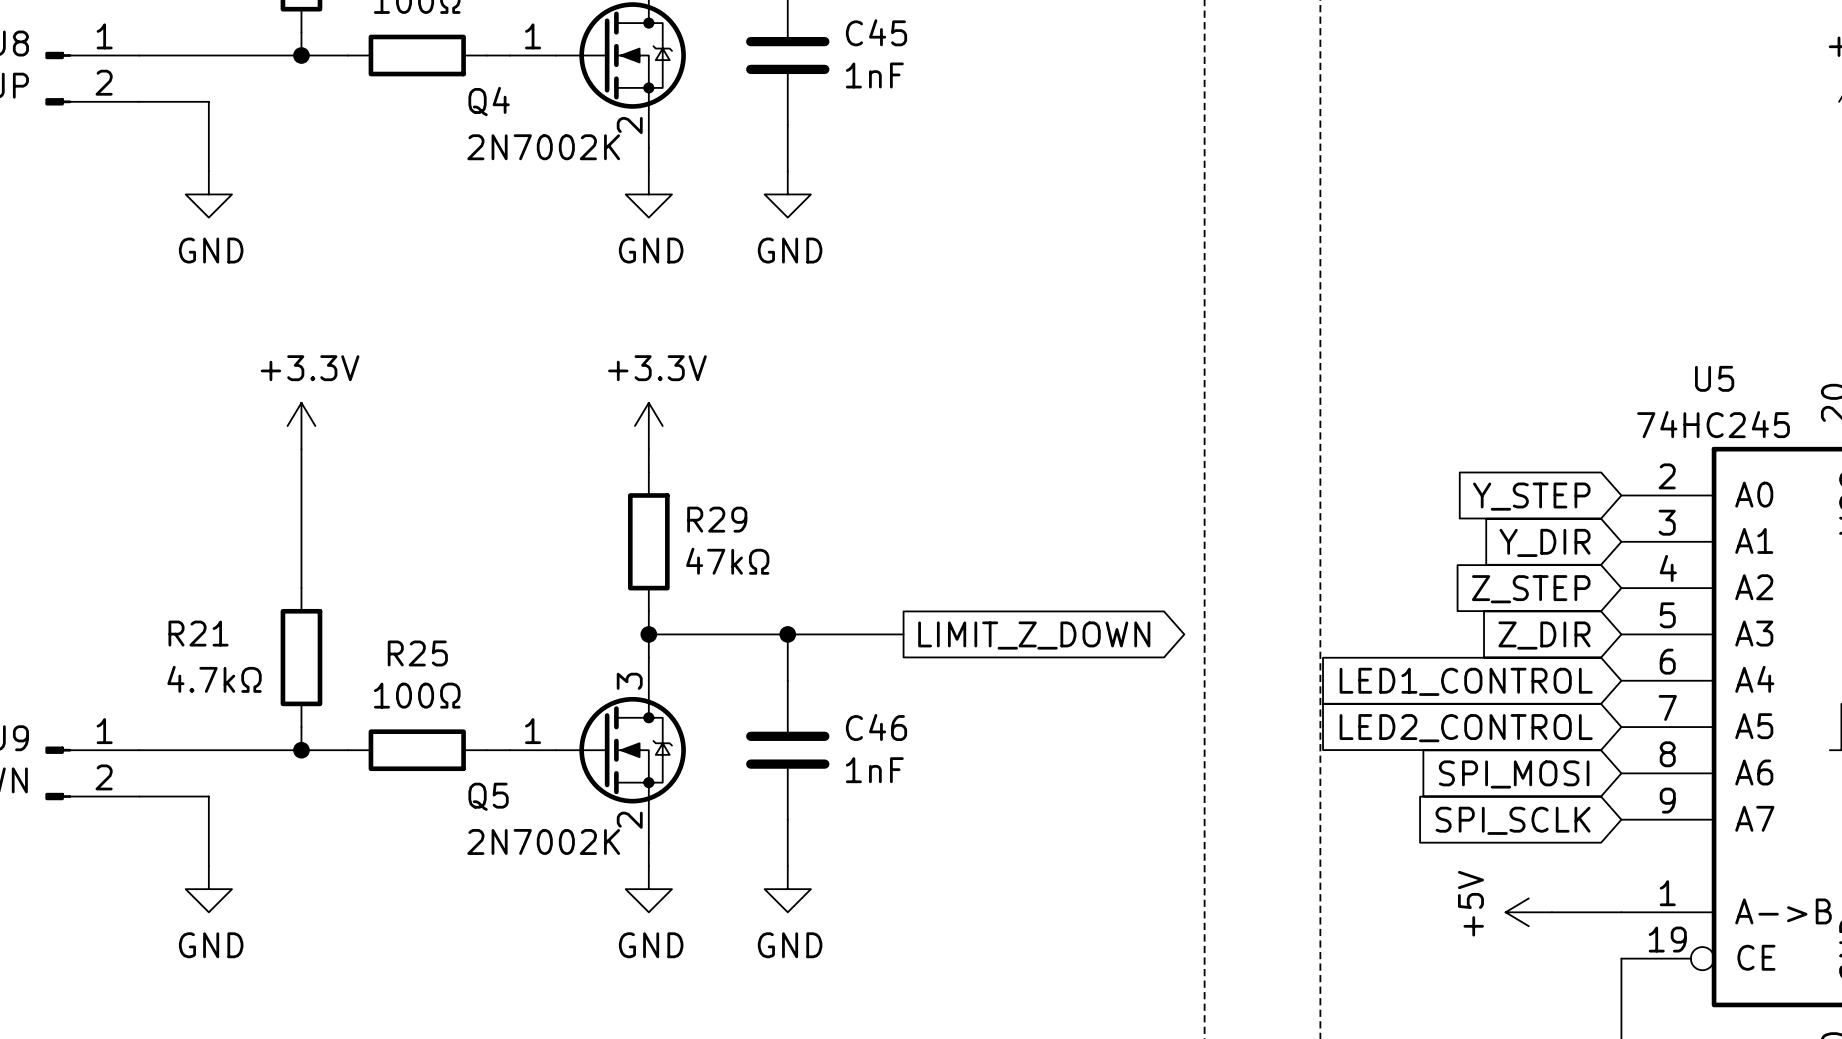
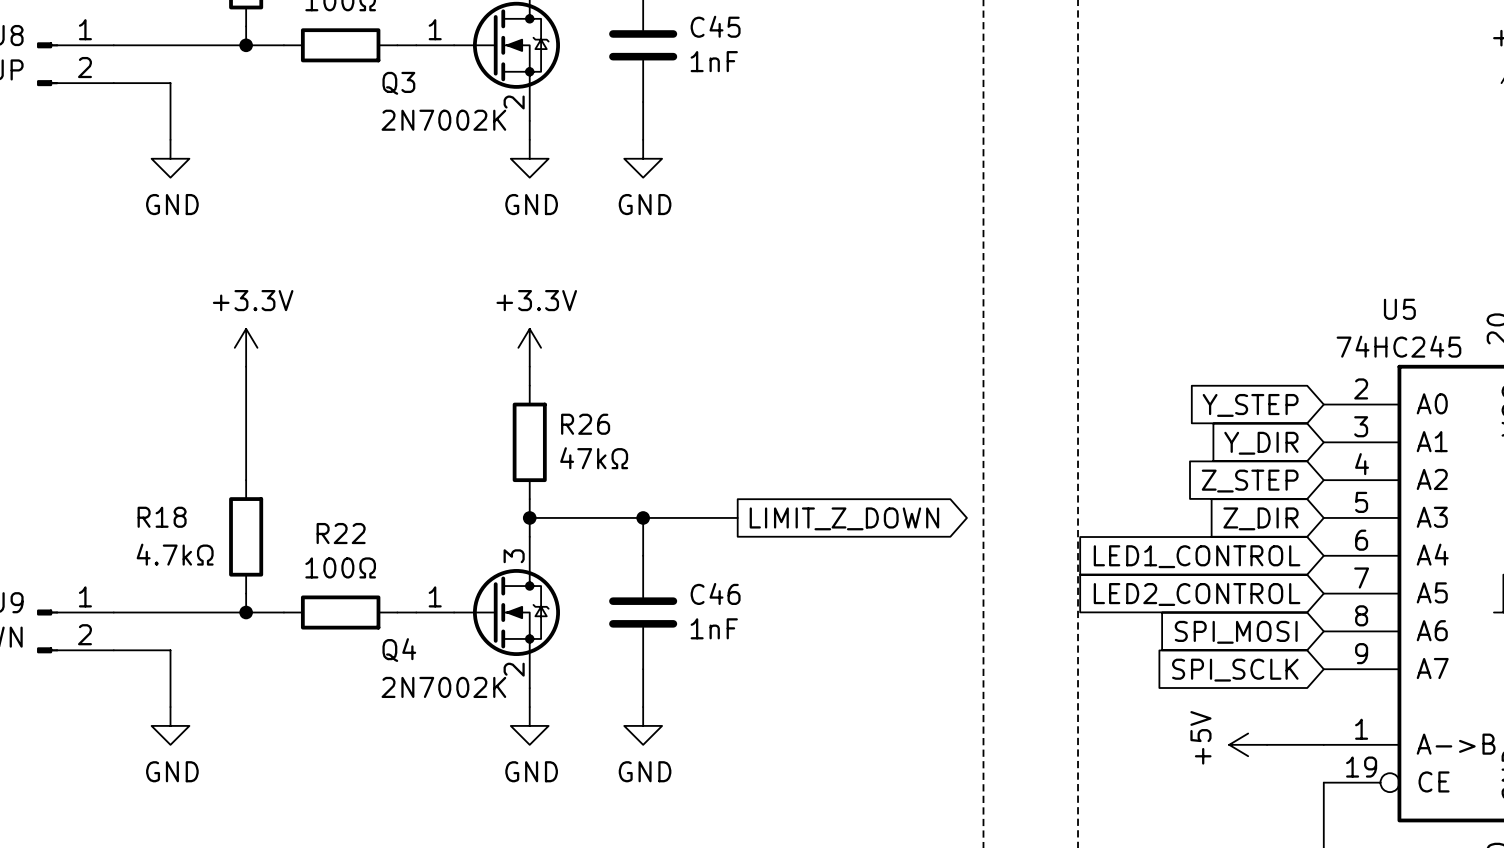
Q4 name: Q4 (489, 101) -> Q3 (398, 83)
R29 name: R29 (717, 519) -> R26 (585, 424)
R21 name: R21 (198, 633) -> R18 (162, 517)
R25 name: R25 (417, 653) -> R22 (341, 533)
Q5 name: Q5 (488, 796) -> Q4 (399, 650)

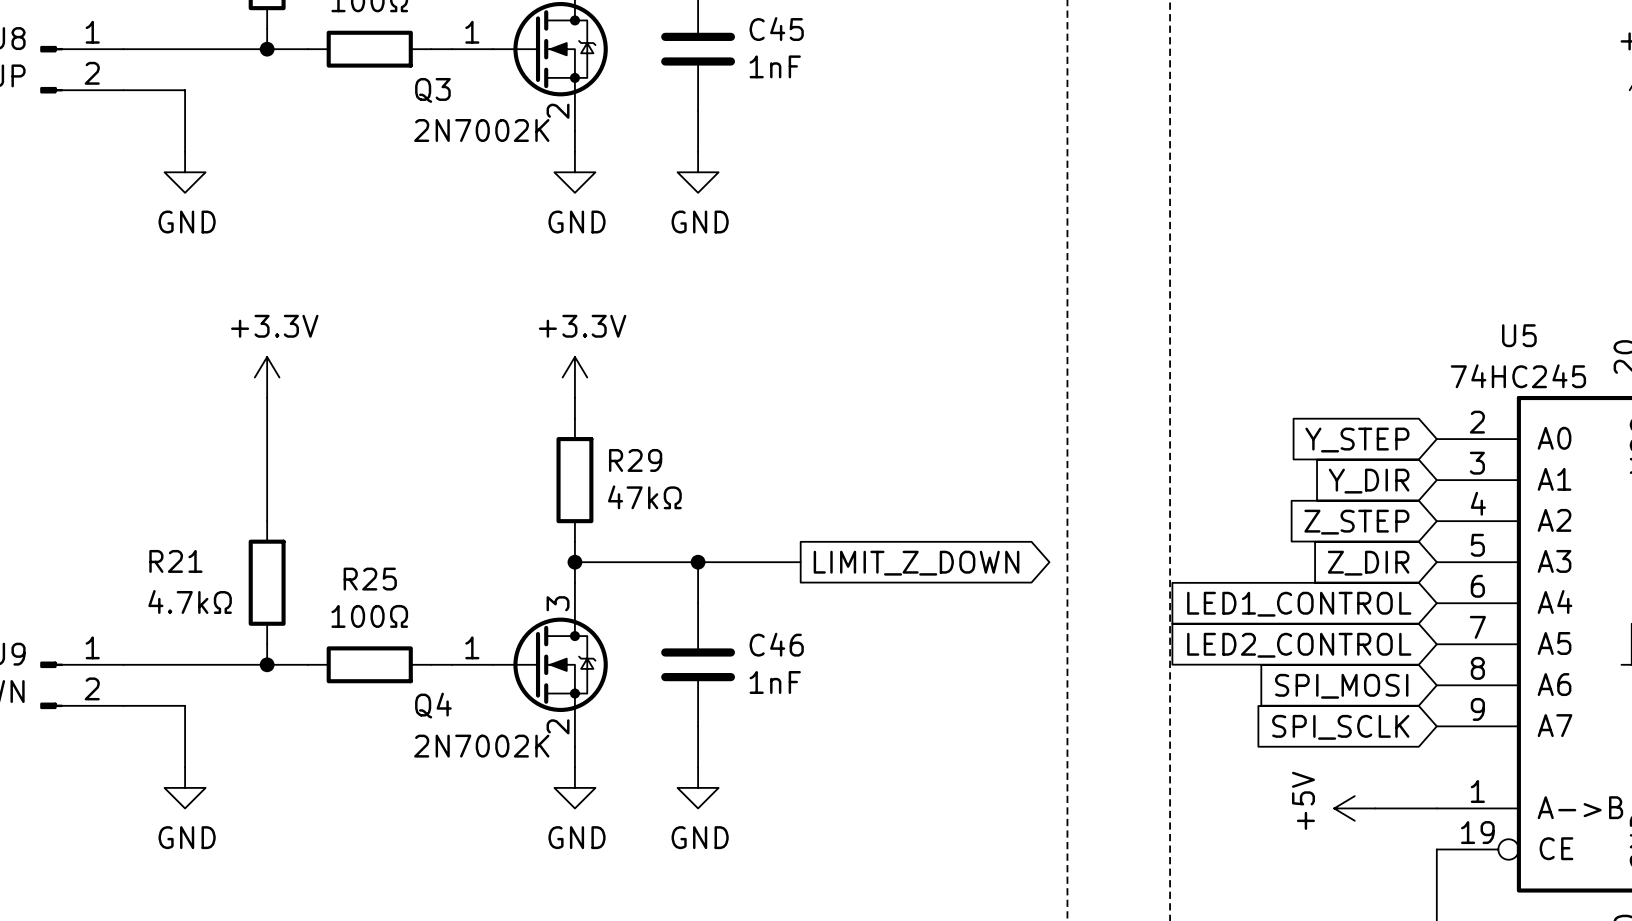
R26 name: R26 (585, 424) -> R29 (635, 460)
R18 name: R18 (162, 517) -> R21 (175, 561)
R22 name: R22 (341, 533) -> R25 (370, 579)

